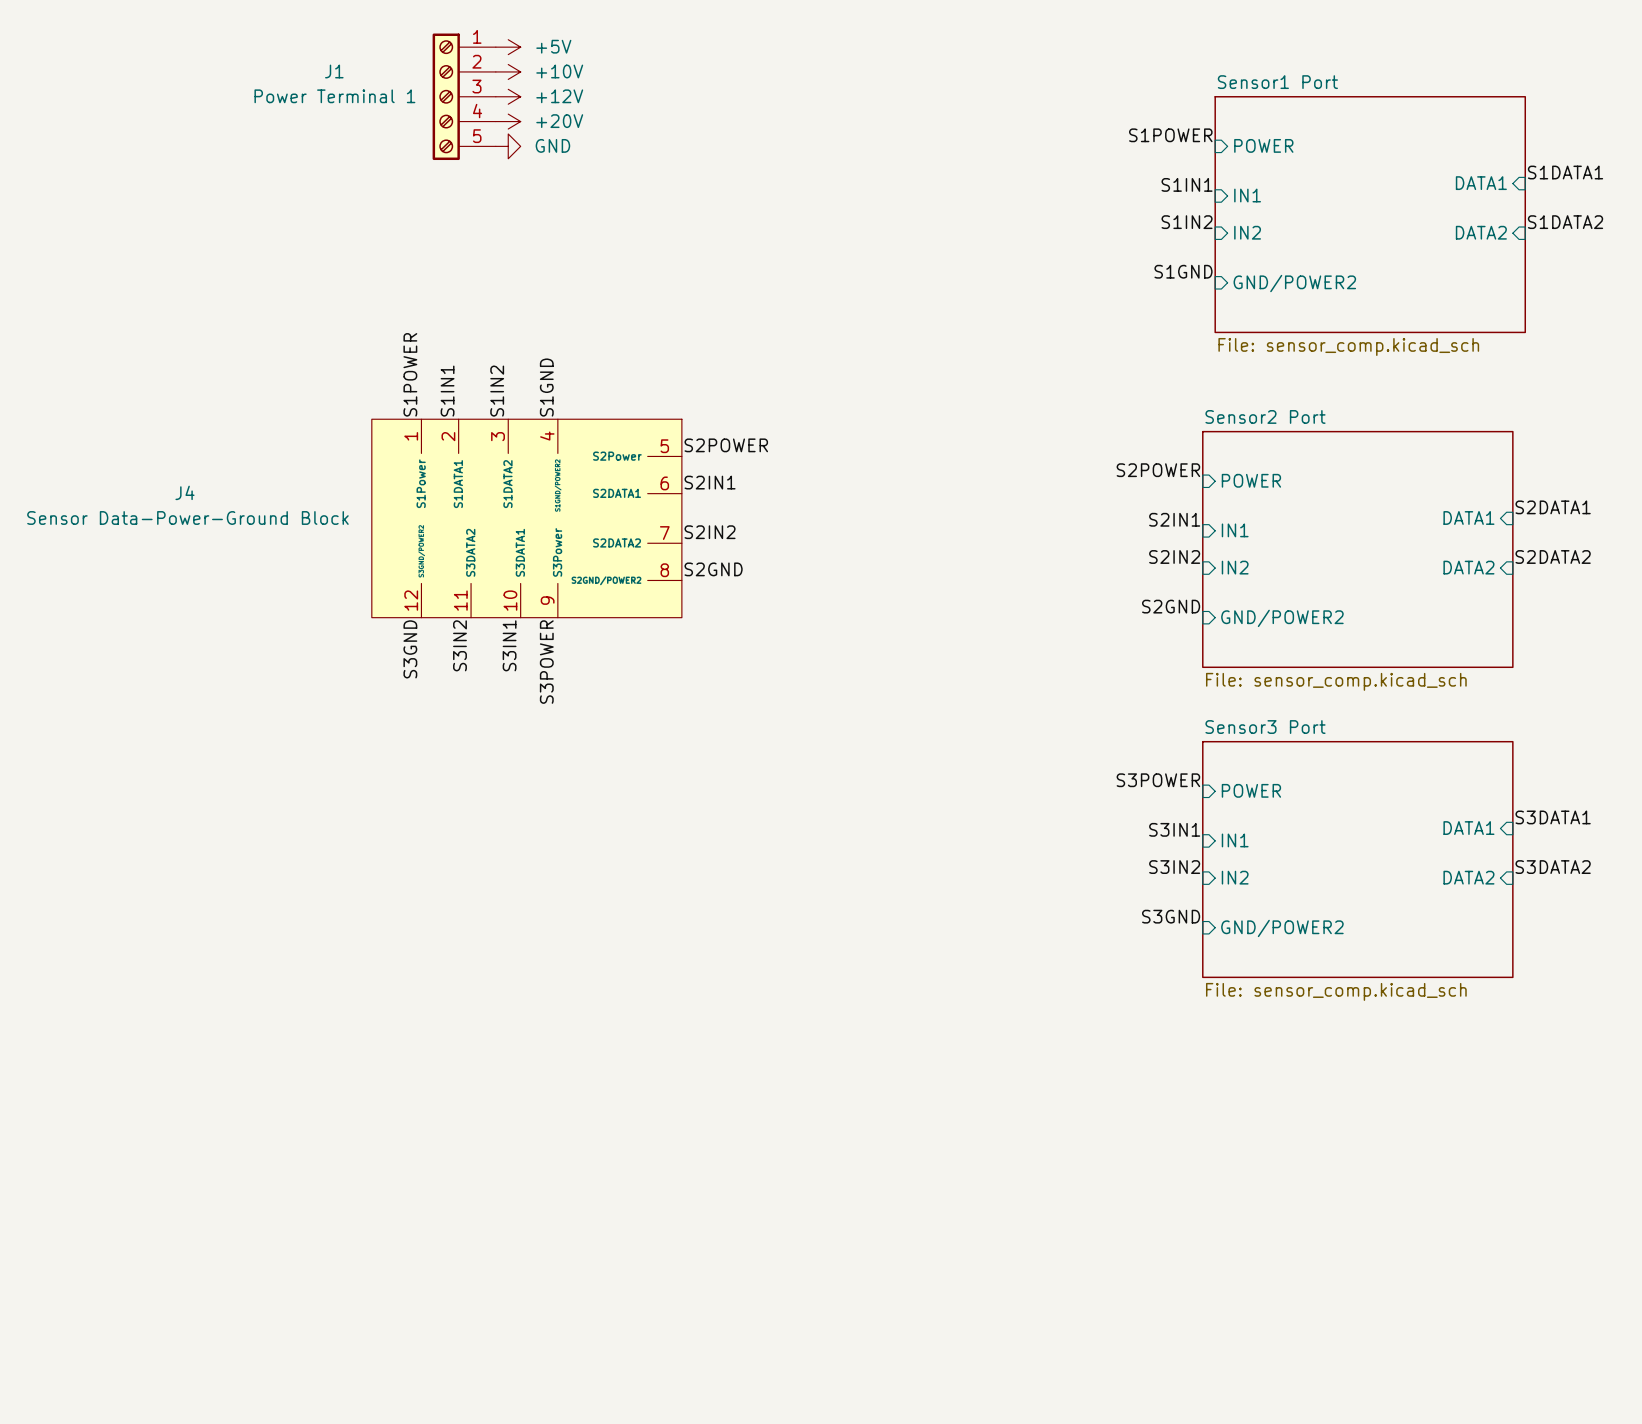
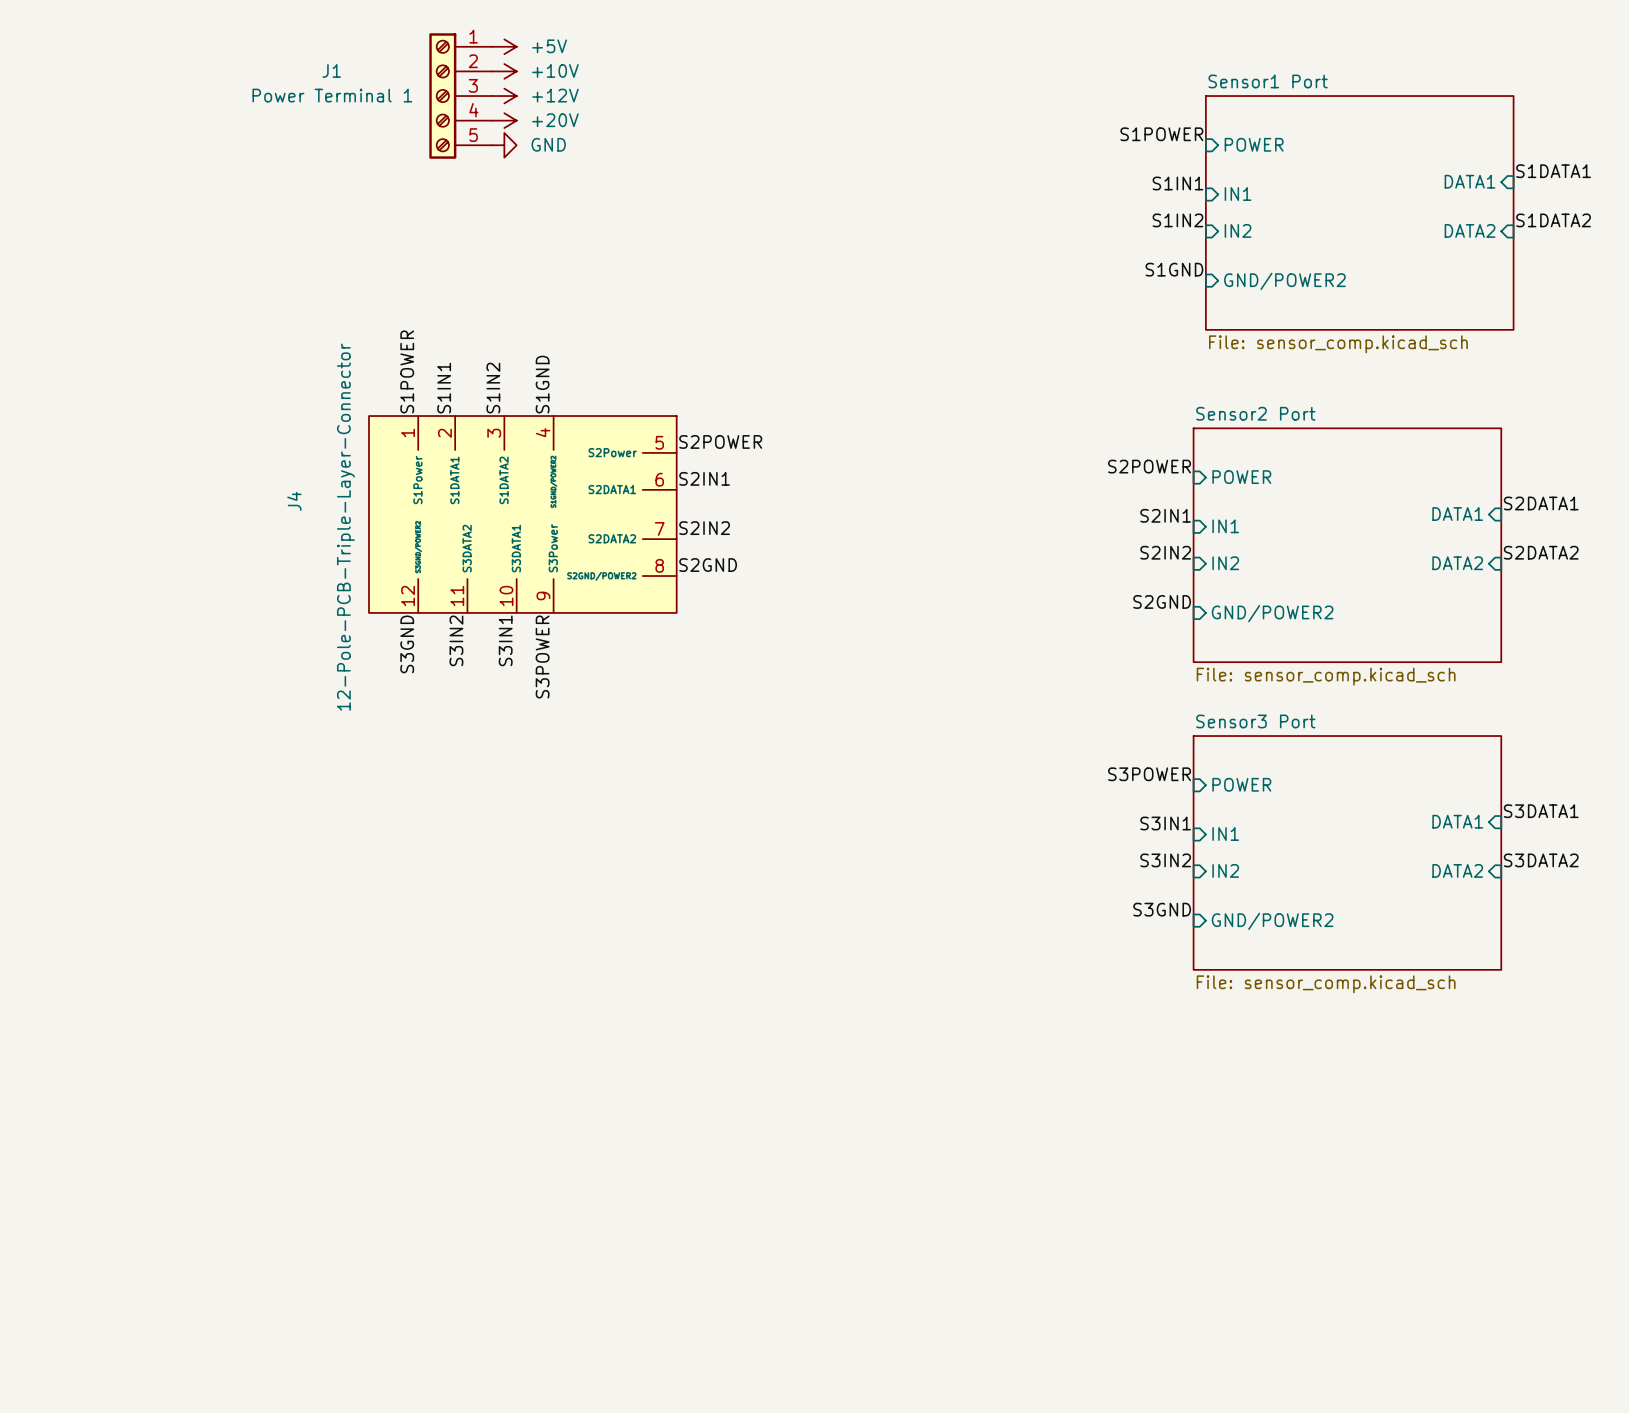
J4 name rotation: 0° (184, 492) -> 90° counterclockwise (294, 501)
J4 name position: J4 (184, 492) -> J4 (294, 501)
J4 value: Sensor Data-Power-Ground Block (187, 517) -> 12-Pole-PCB-Triple-Layer-Connector (345, 527)

